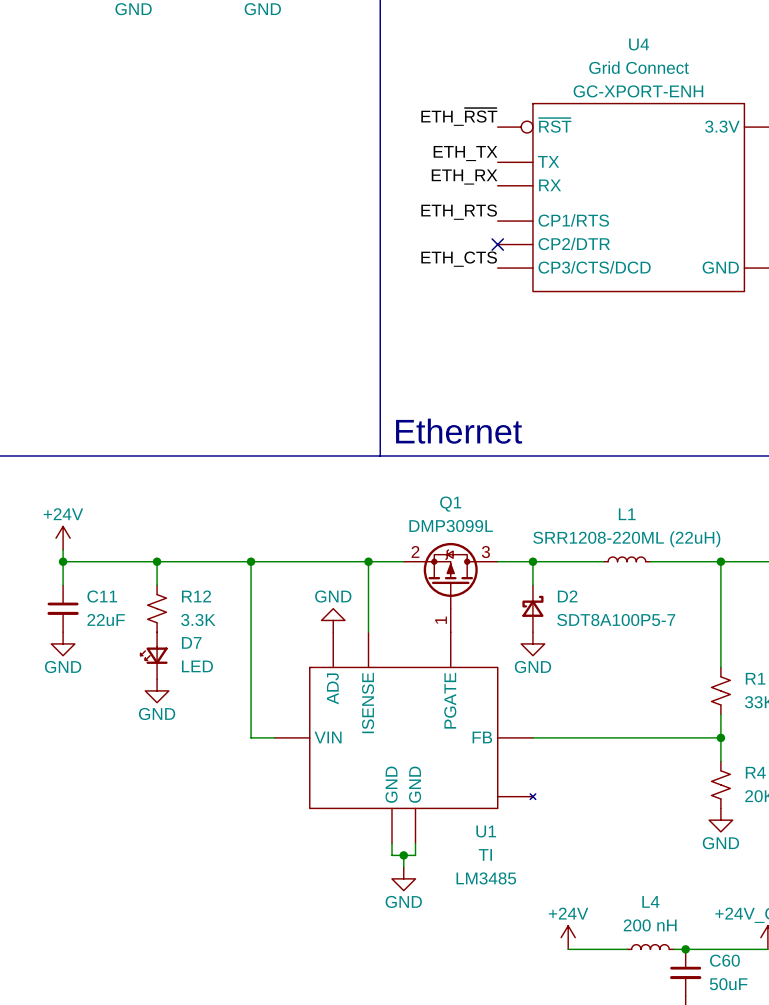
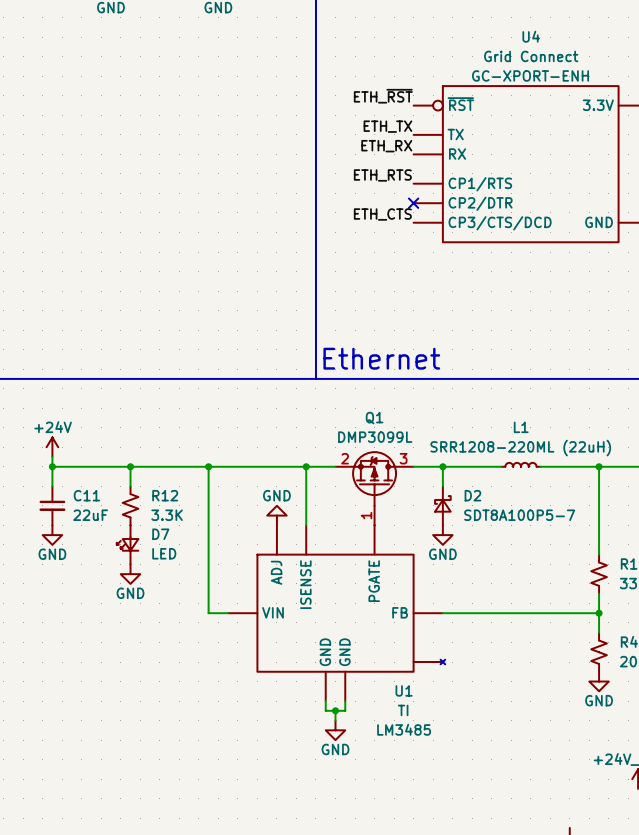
power symbol: +24V (568, 937) -> none
L4: 200 nH (650, 947) -> none
wire: (568, 949) (626, 949) -> none
wire: (673, 949) (767, 949) -> none
junction: (685, 949) -> none
C60: 50uF (685, 972) -> none

